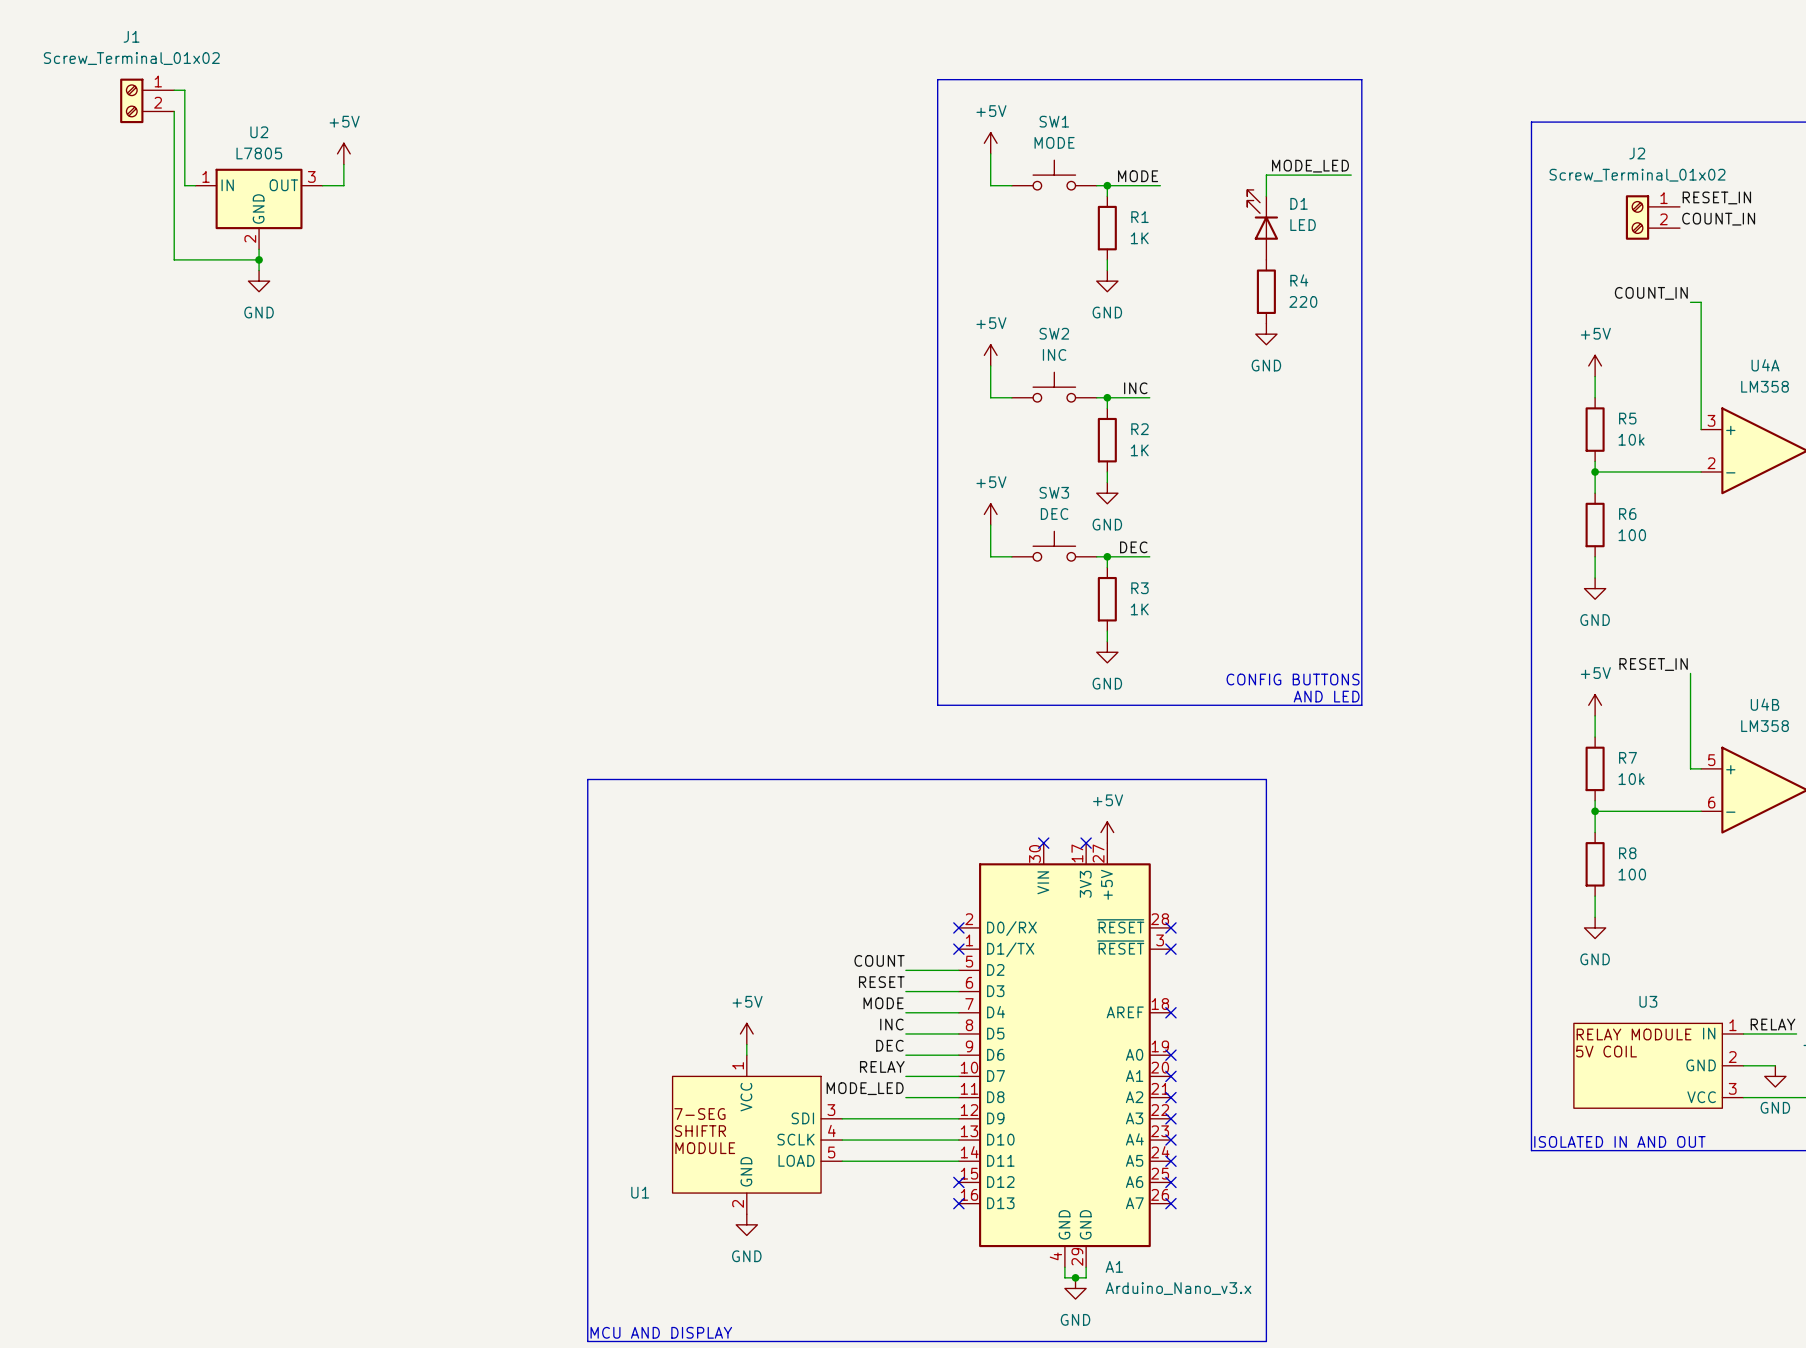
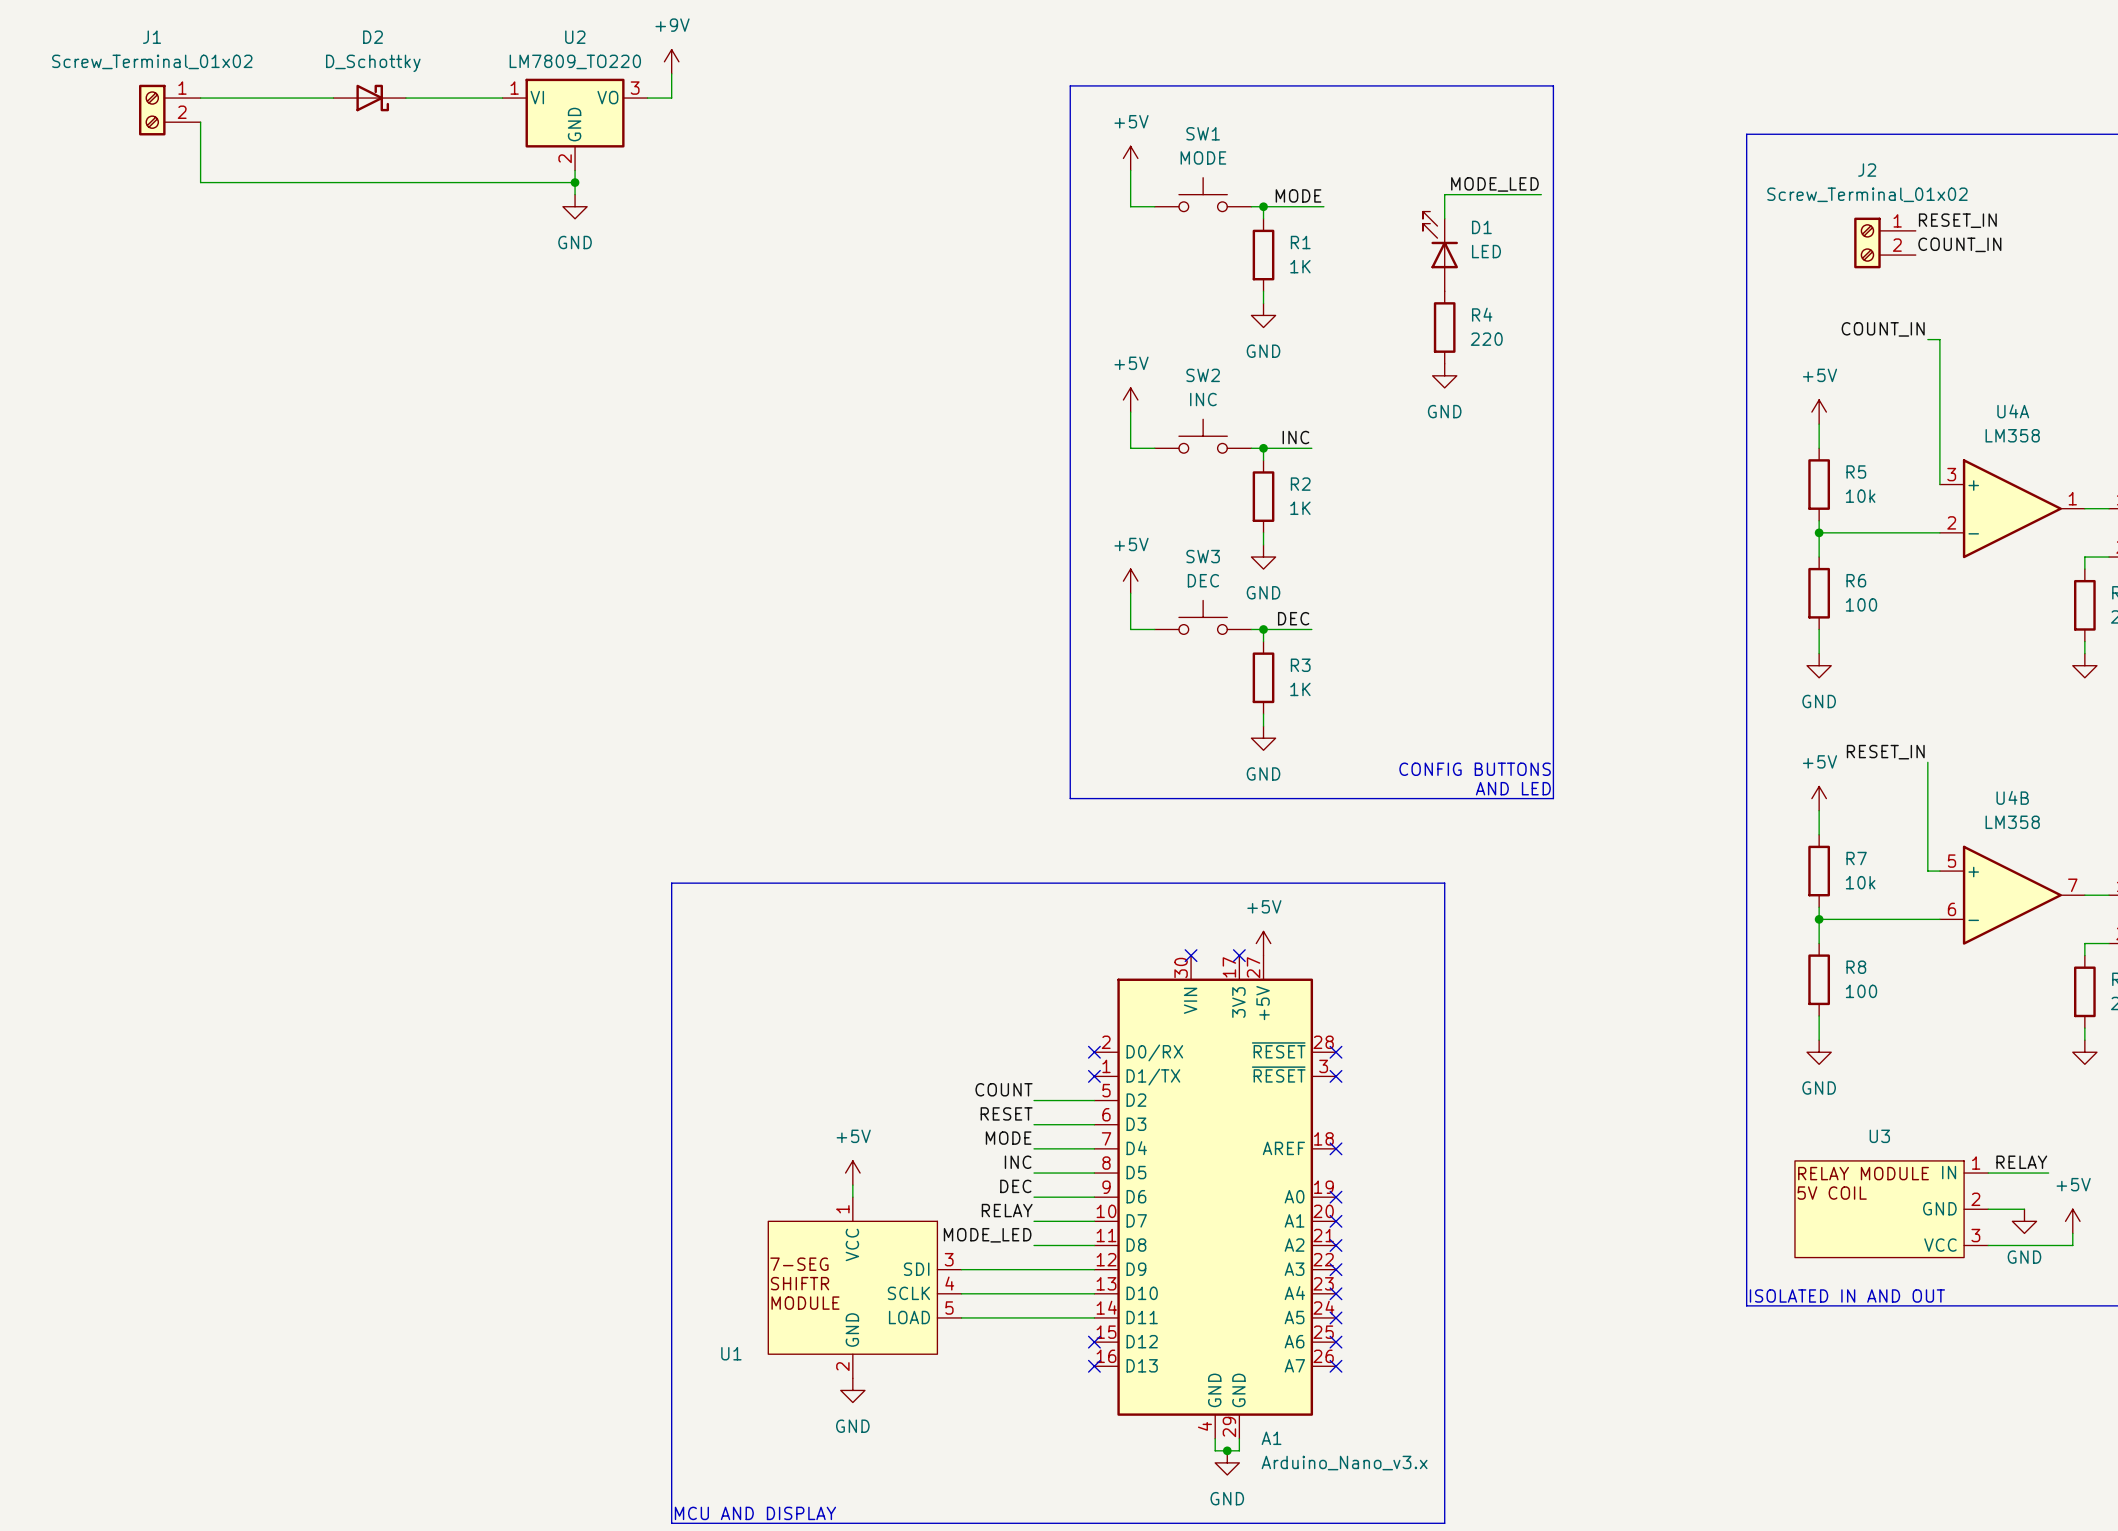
power symbol: none -> +9V (671, 61)
wire: none -> (671, 73) (671, 98) (647, 98)
wire: (184, 90) (184, 185) (195, 185) -> (212, 98) (333, 98)
D2: none -> D_Schottky (369, 98)
wire: none -> (405, 98) (502, 98)
U2 value: L7805 (259, 153) -> LM7809_TO220 (575, 61)
power symbol: +5V (343, 153) -> none
wire: none -> (575, 170) (575, 194)
wire: (174, 164) (174, 259) (259, 259) -> (200, 182) (575, 182)
wire: (343, 164) (343, 185) (322, 185) -> none
junction: none -> (575, 182)
U2 pin name: IN (227, 185) -> VI (537, 97)
U2 pin name: OUT (283, 185) -> VO (607, 97)
power symbol: none -> GND (575, 206)
U2 position: (259, 209) -> (575, 124)
wire: (259, 249) (259, 270) -> none
junction: (259, 259) -> none
power symbol: GND (259, 281) -> none

